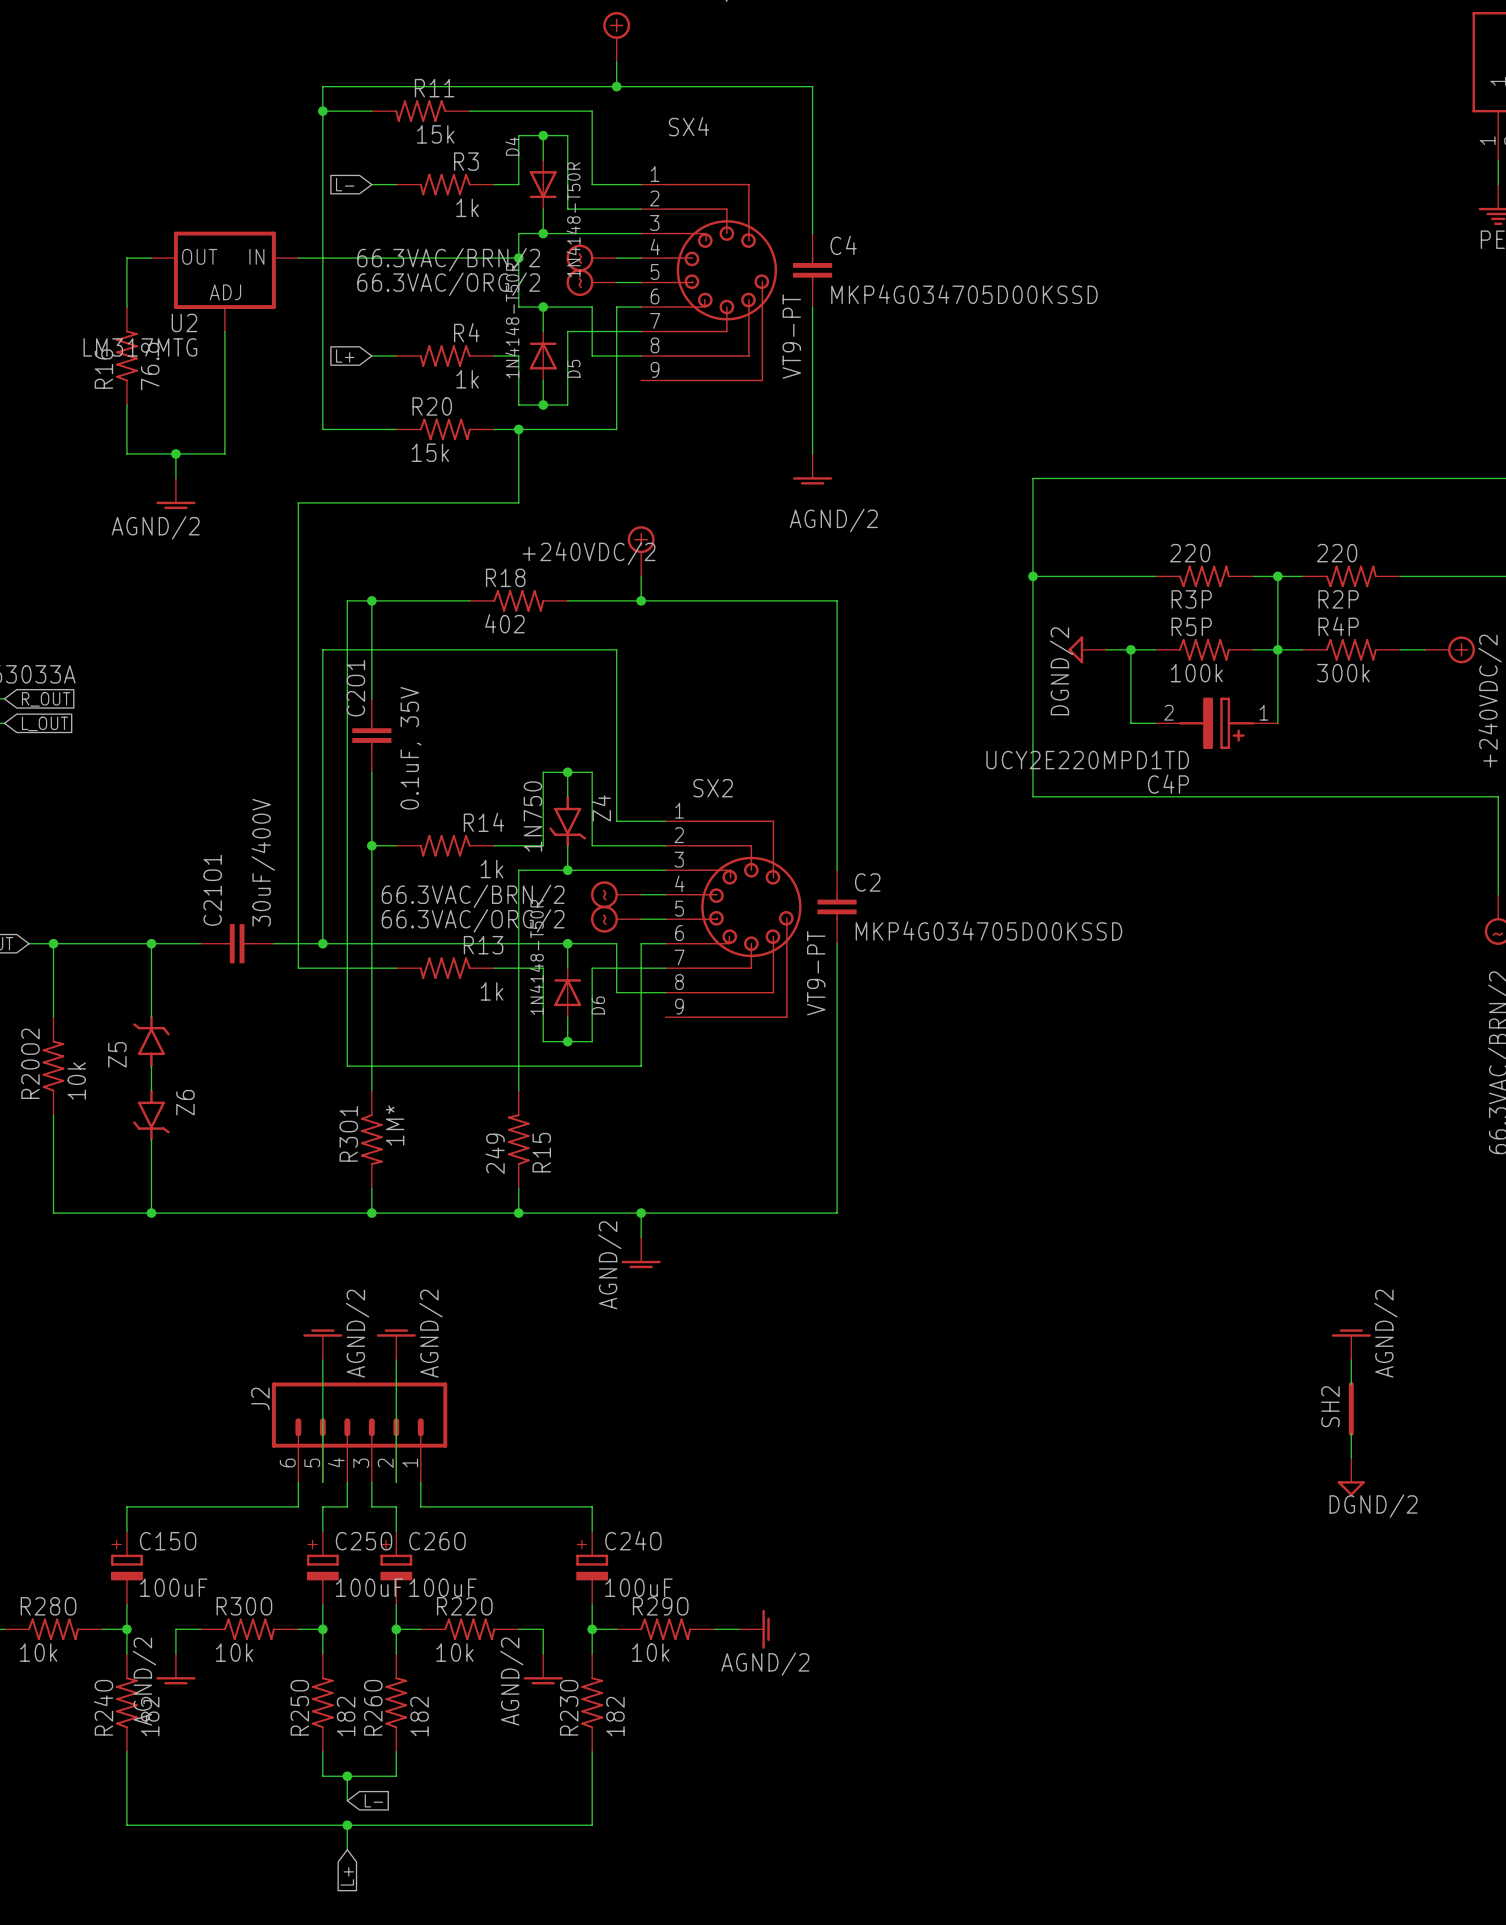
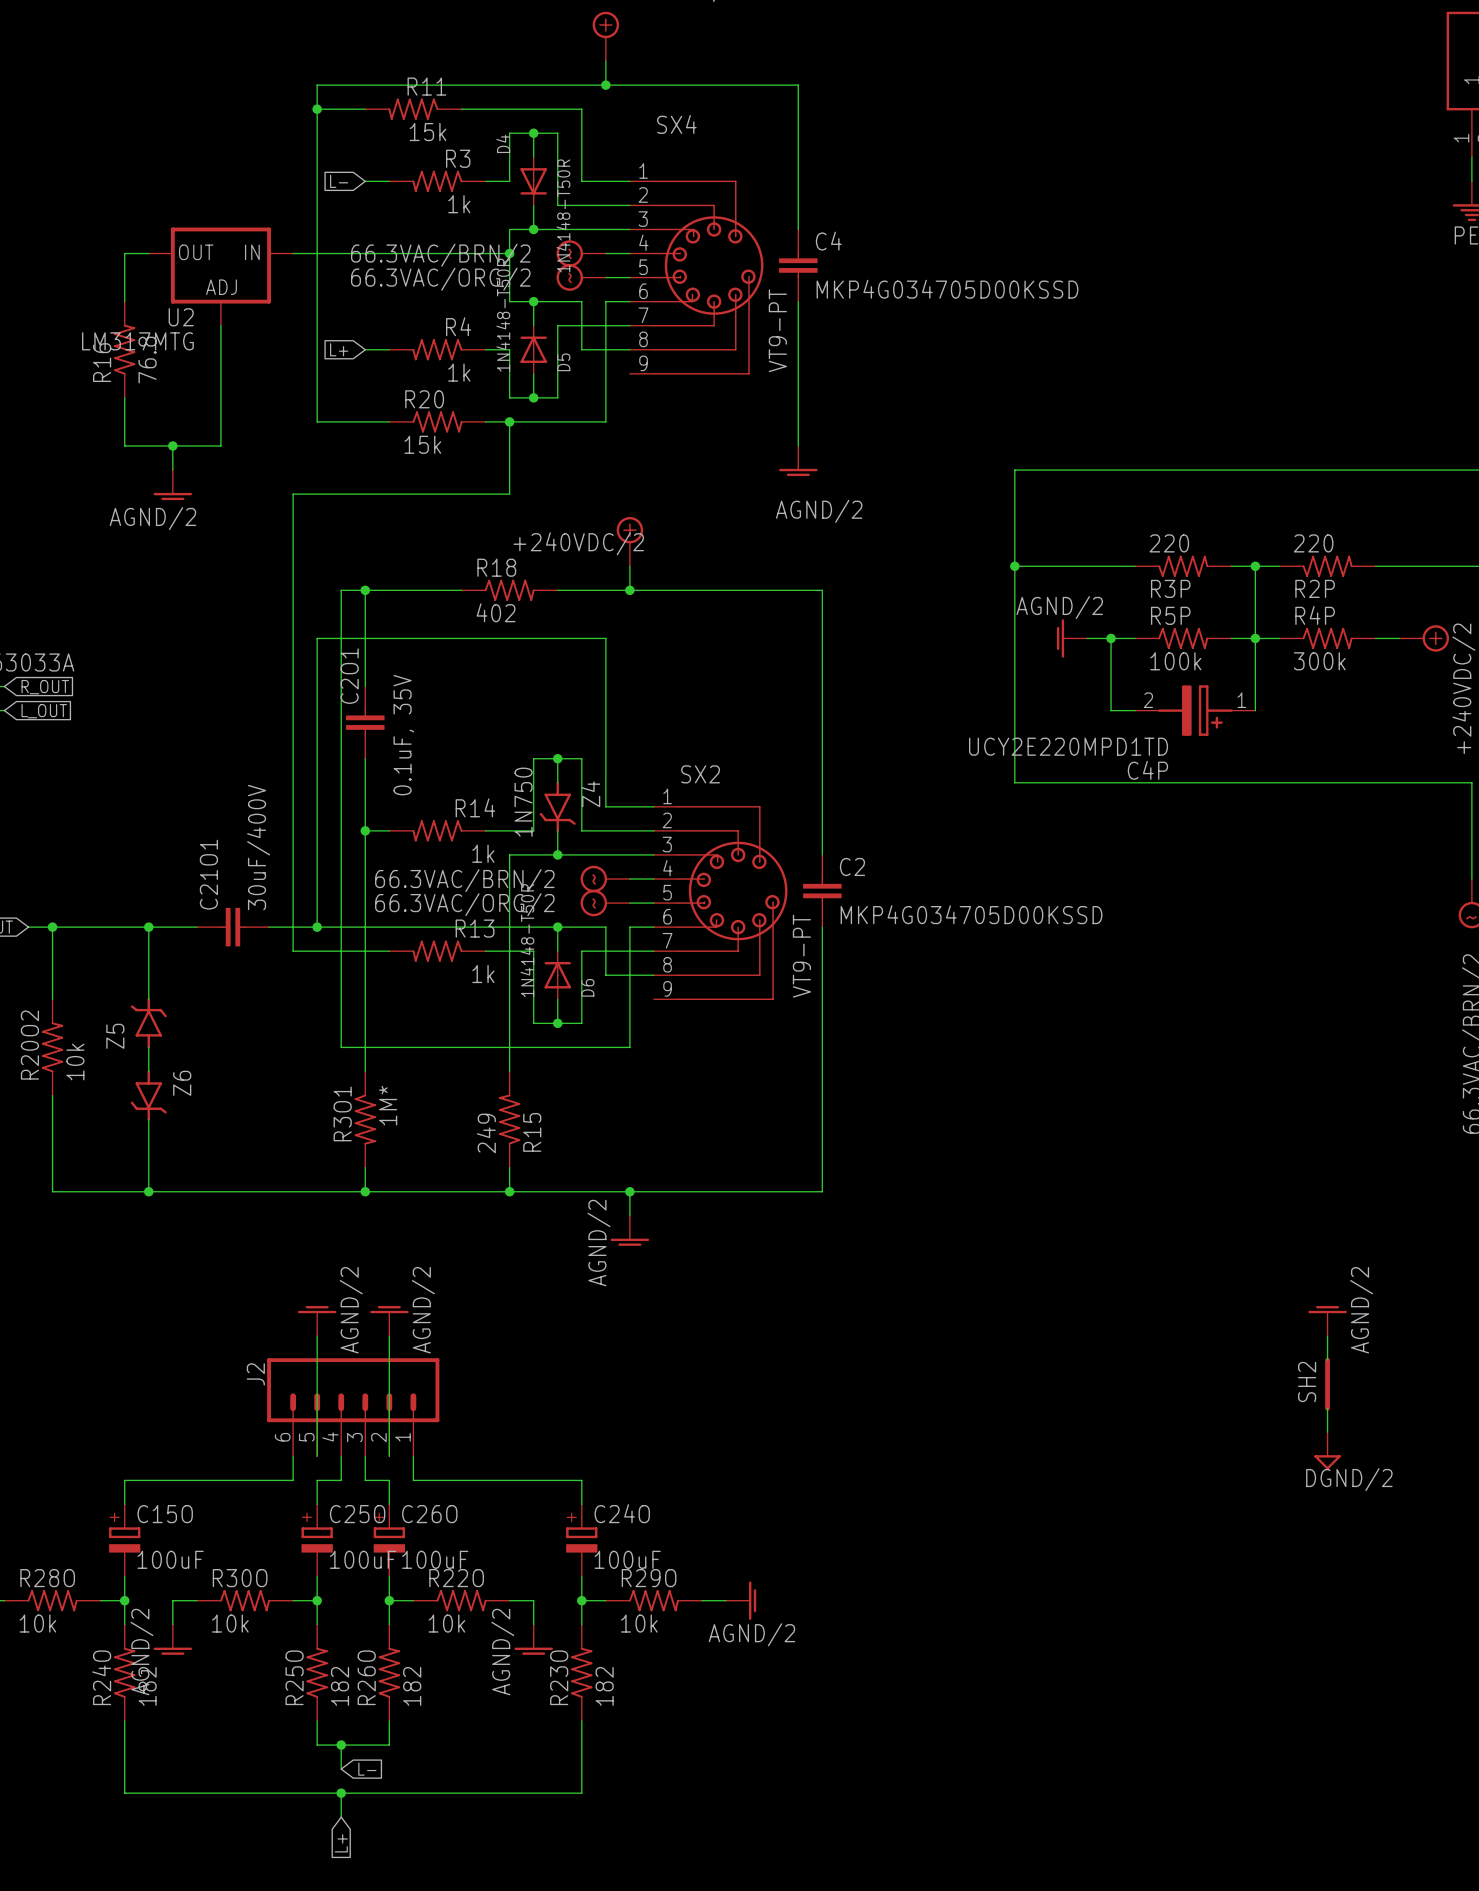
power symbol: DGND/2 (1087, 649) -> AGND/2 (1071, 638)

